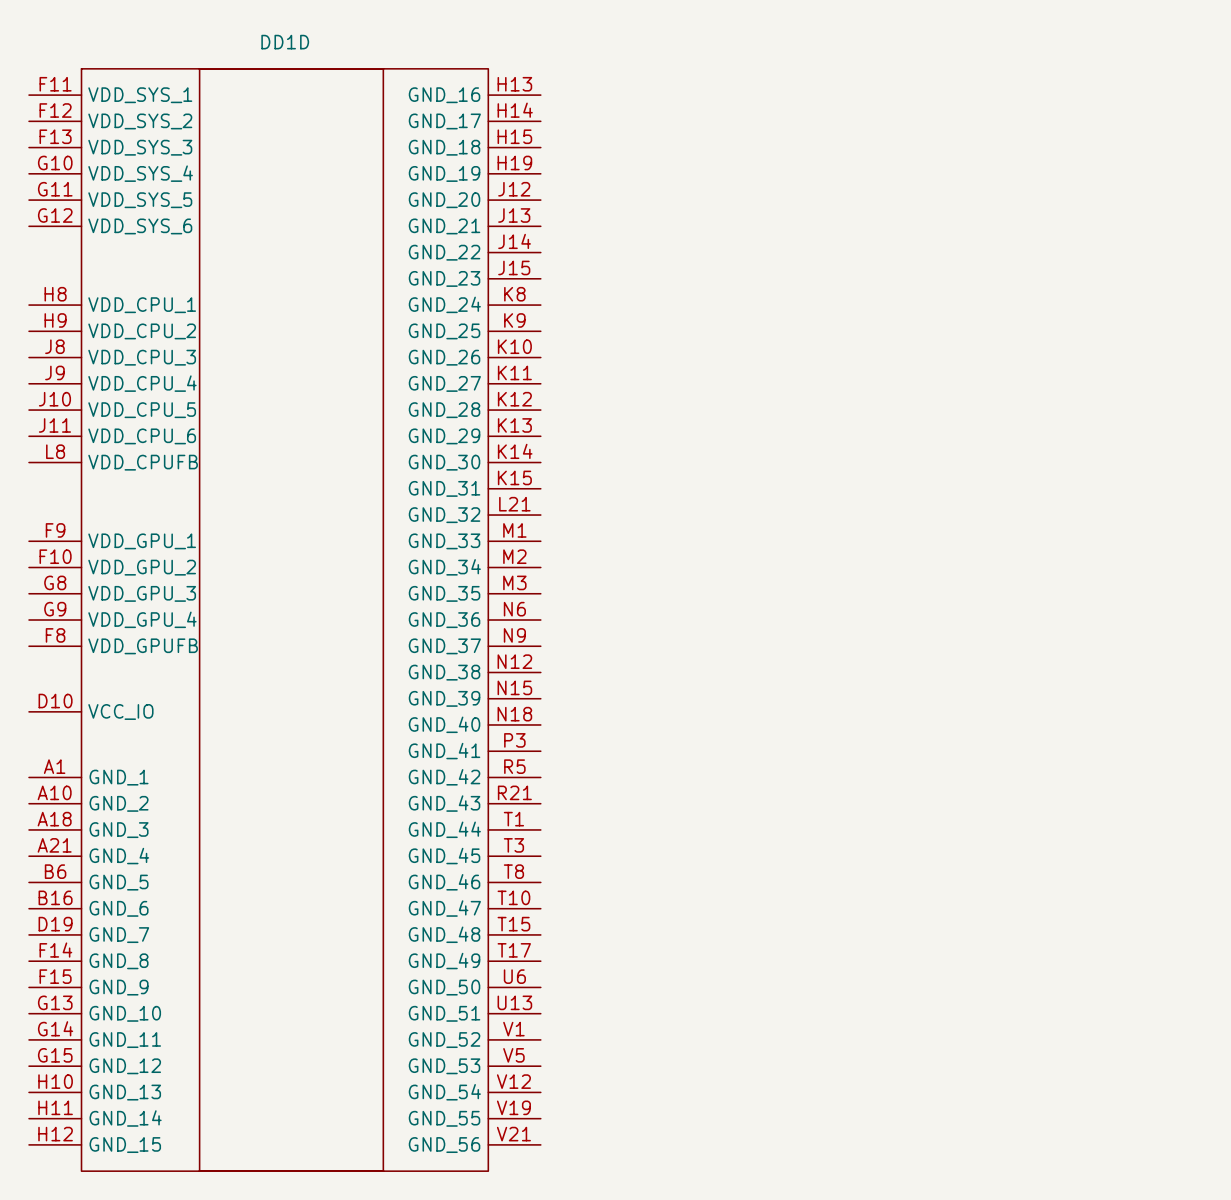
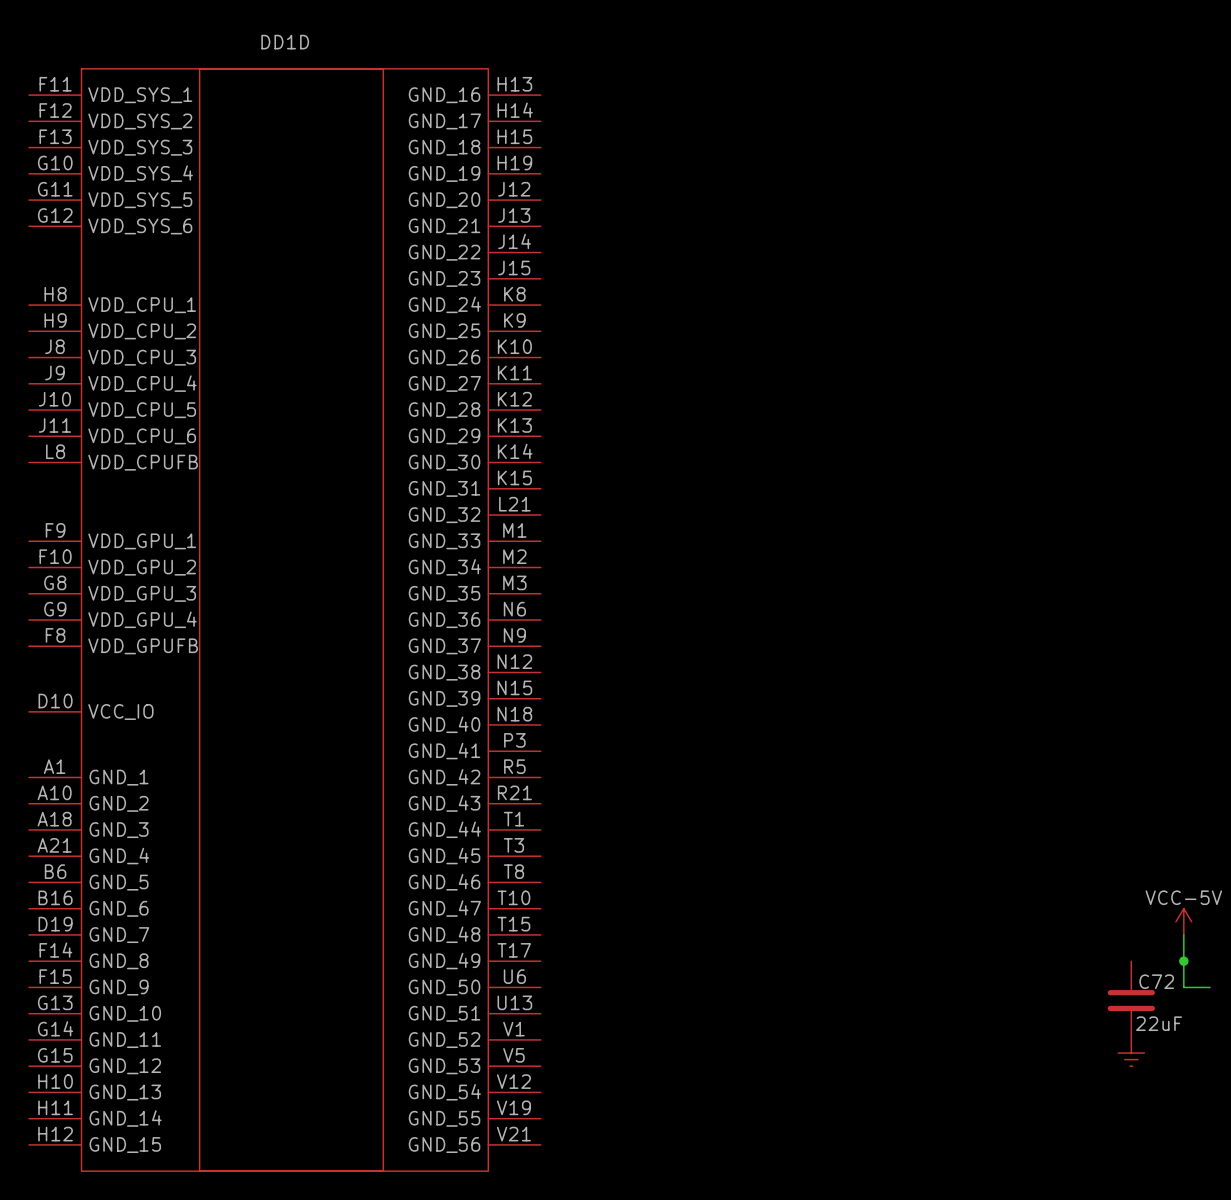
power symbol: none -> VCC-5V (1183, 921)
wire: none -> (1183, 934) (1183, 987) (1210, 987)
junction: none -> (1183, 961)
C72: none -> 22uF (1131, 1000)
power symbol: none -> (1131, 1053)

